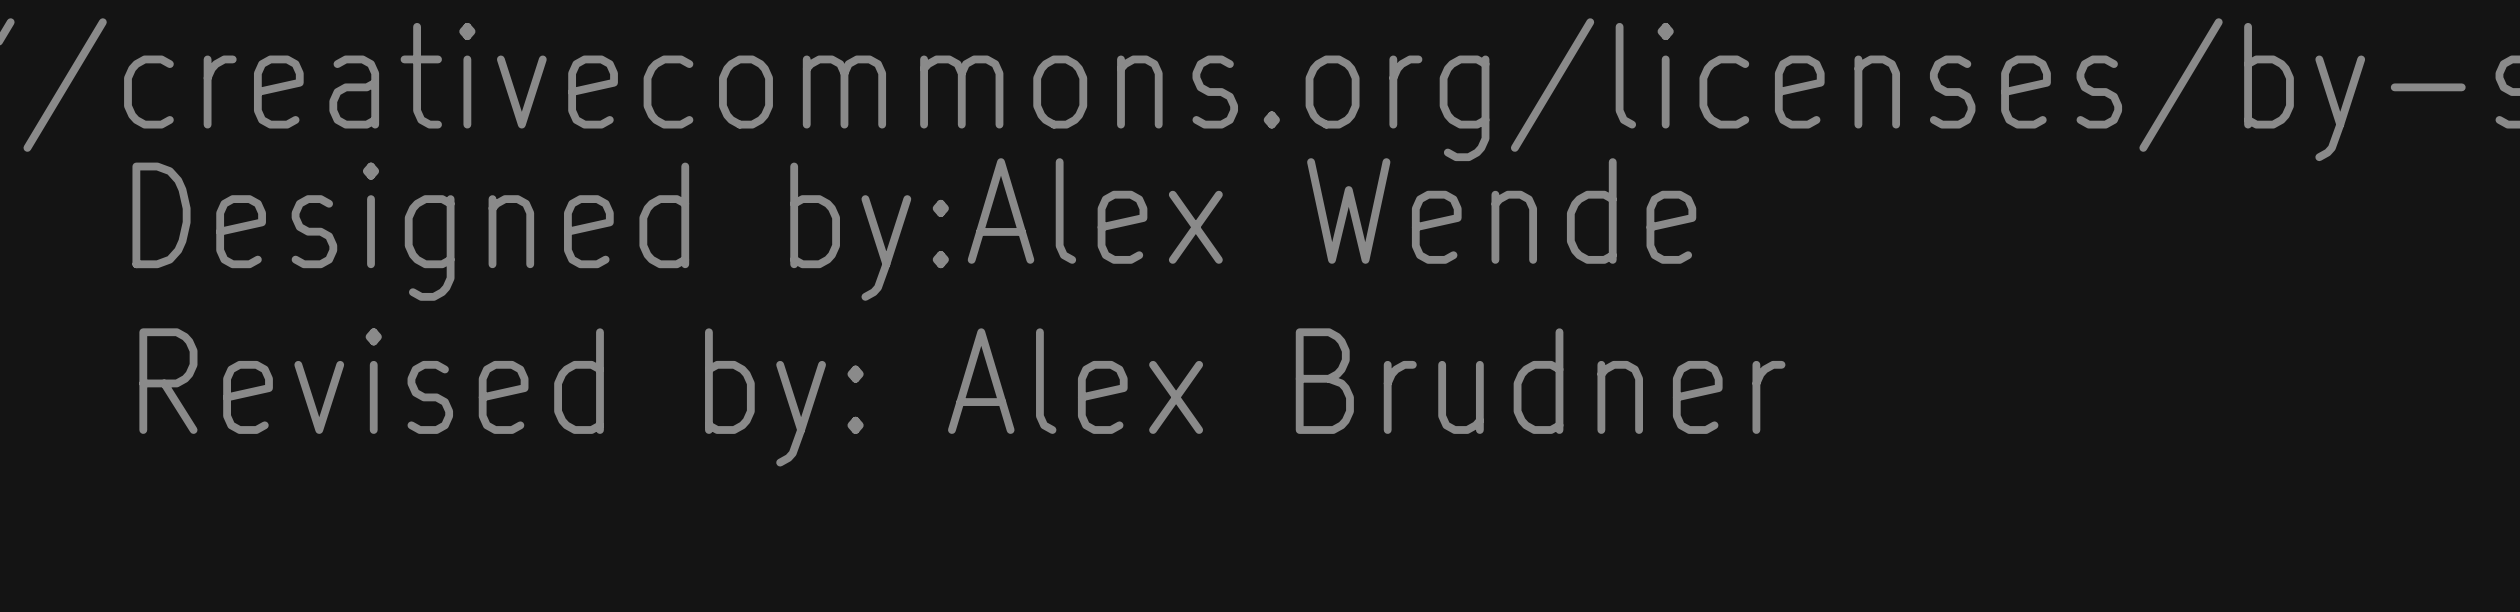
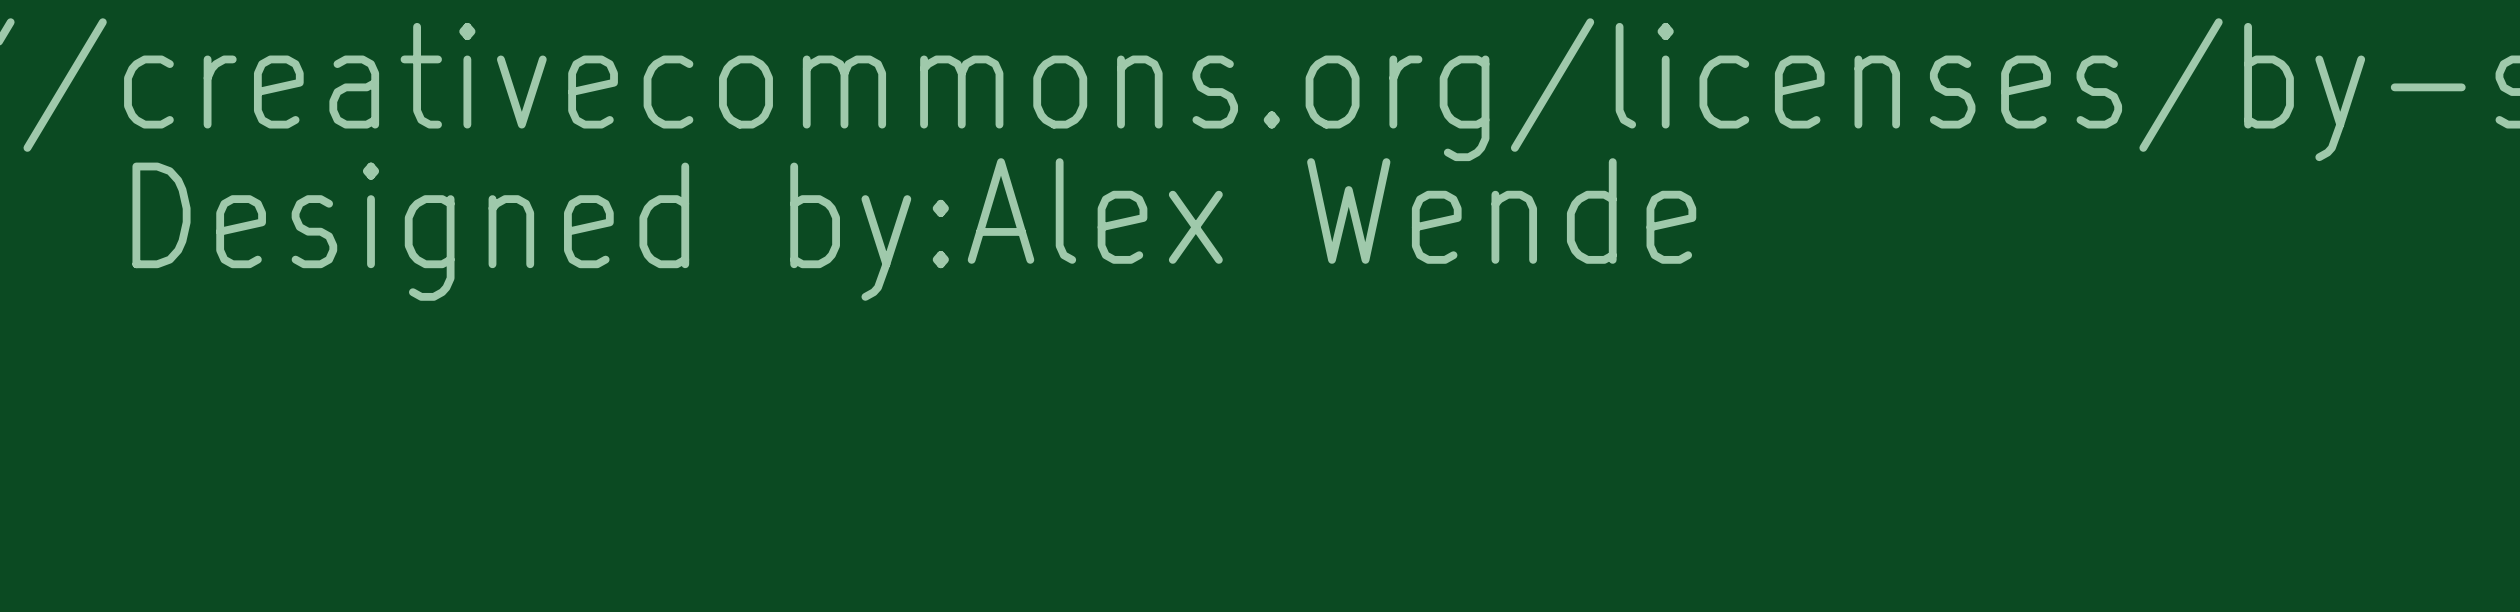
text: Revised by: Alex Brudner (962, 397) -> none

